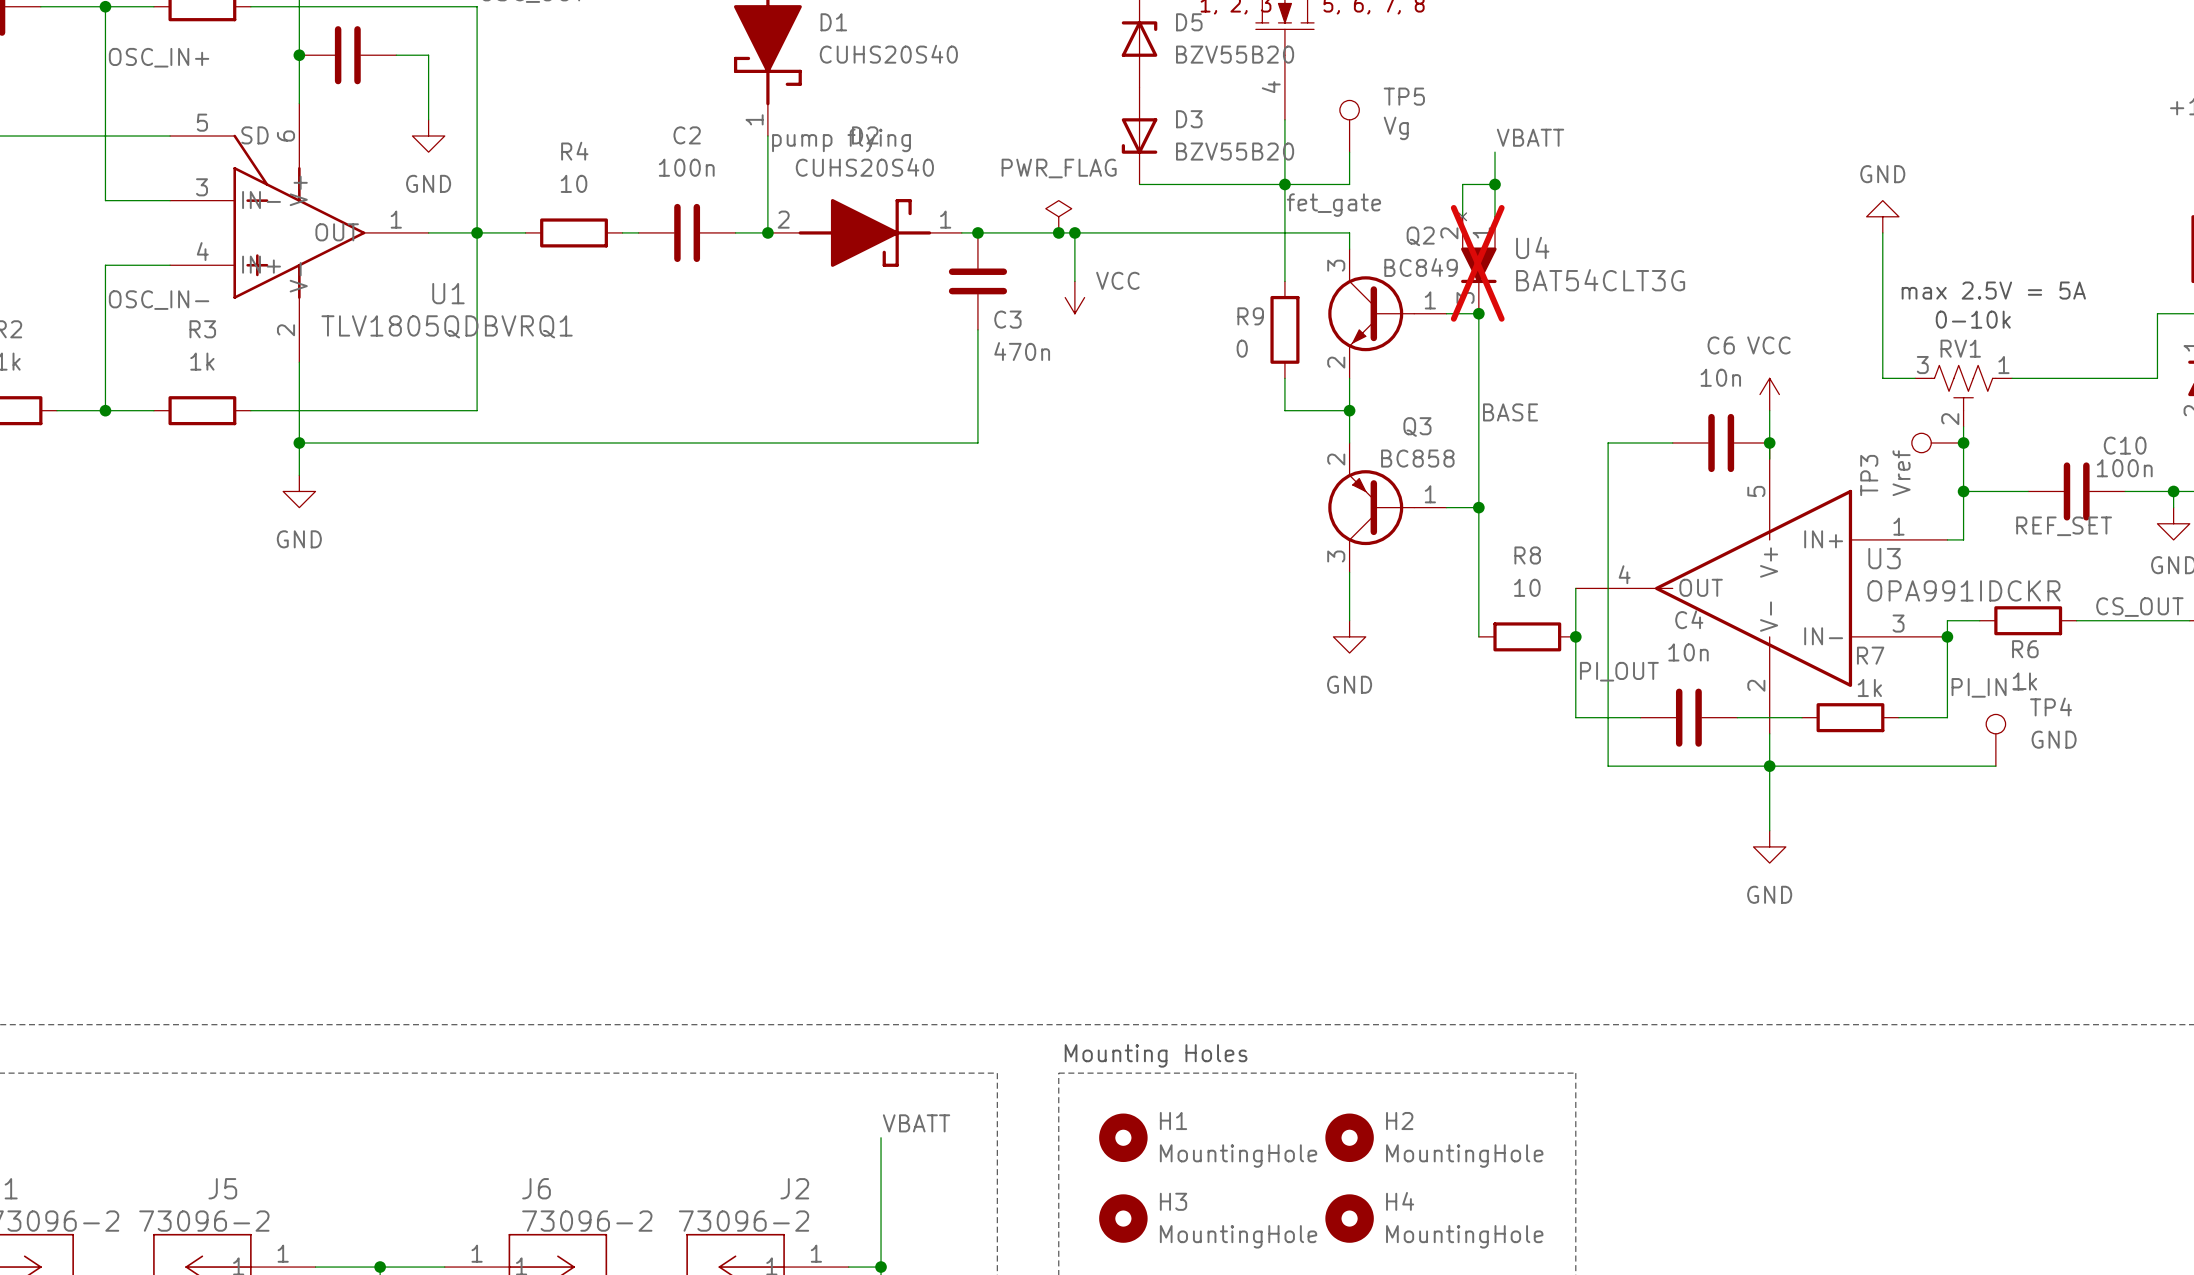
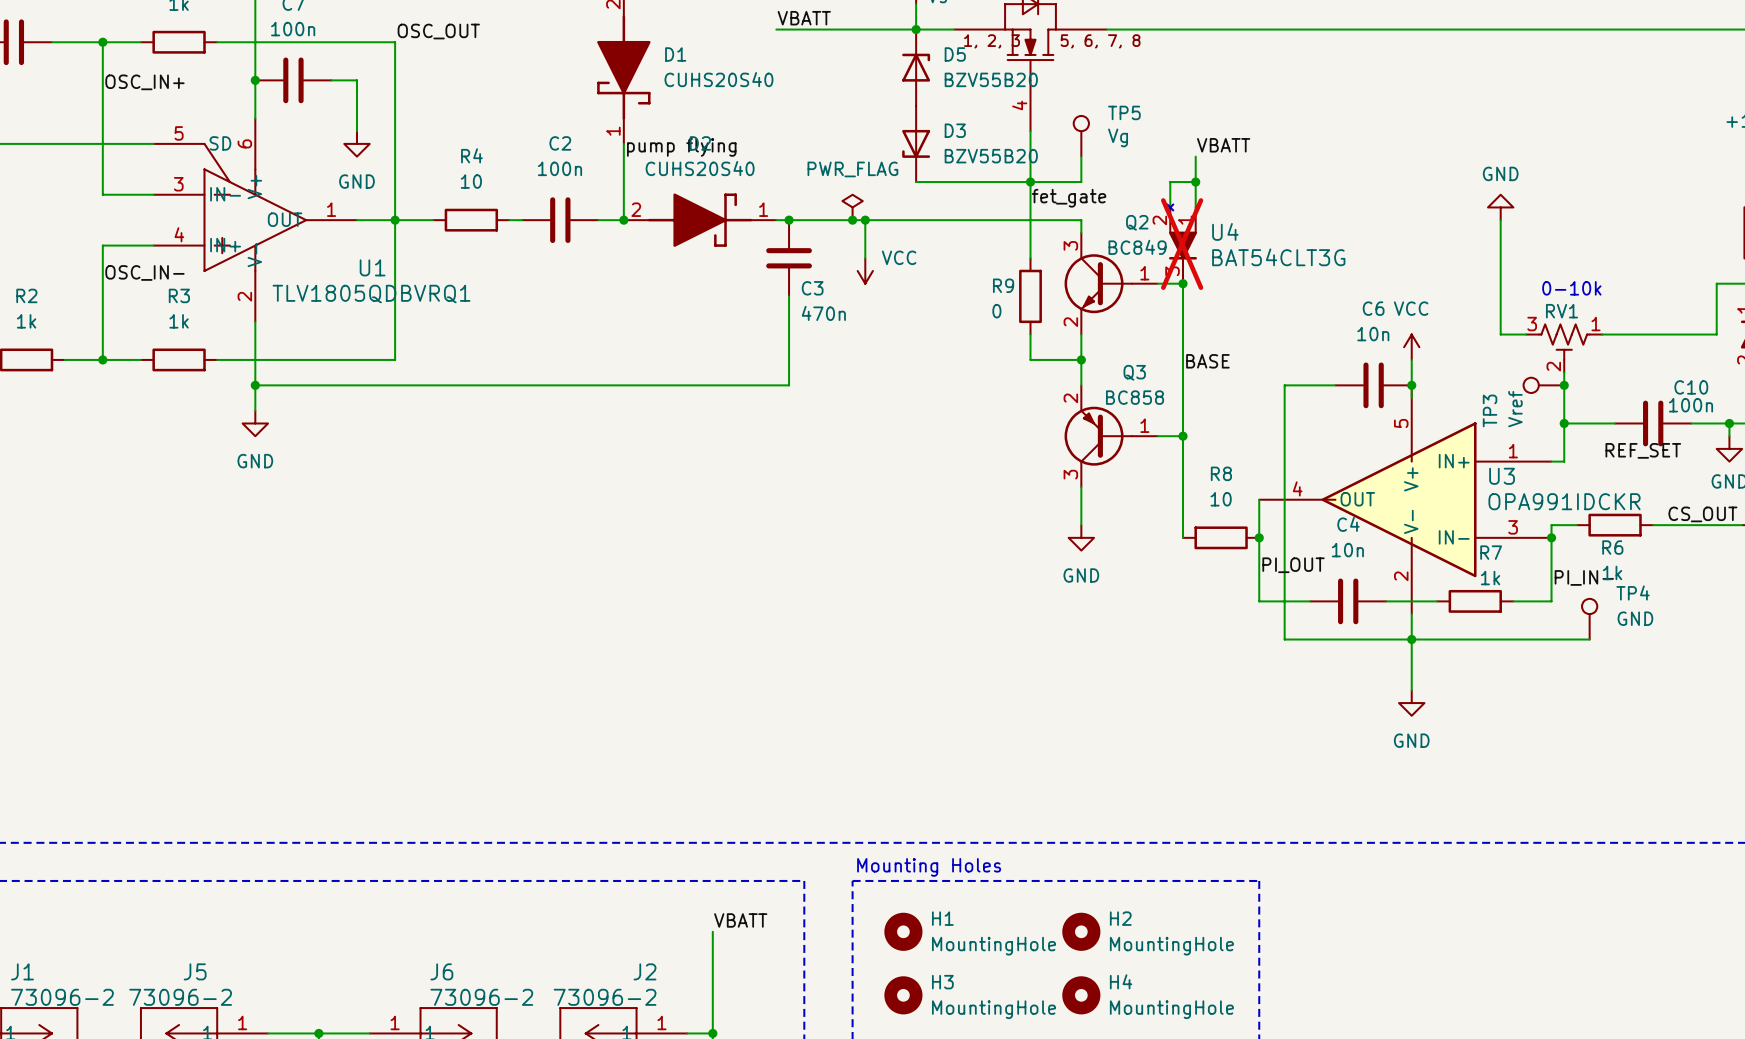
text: max 2.5V = 5A (1993, 290) -> none

